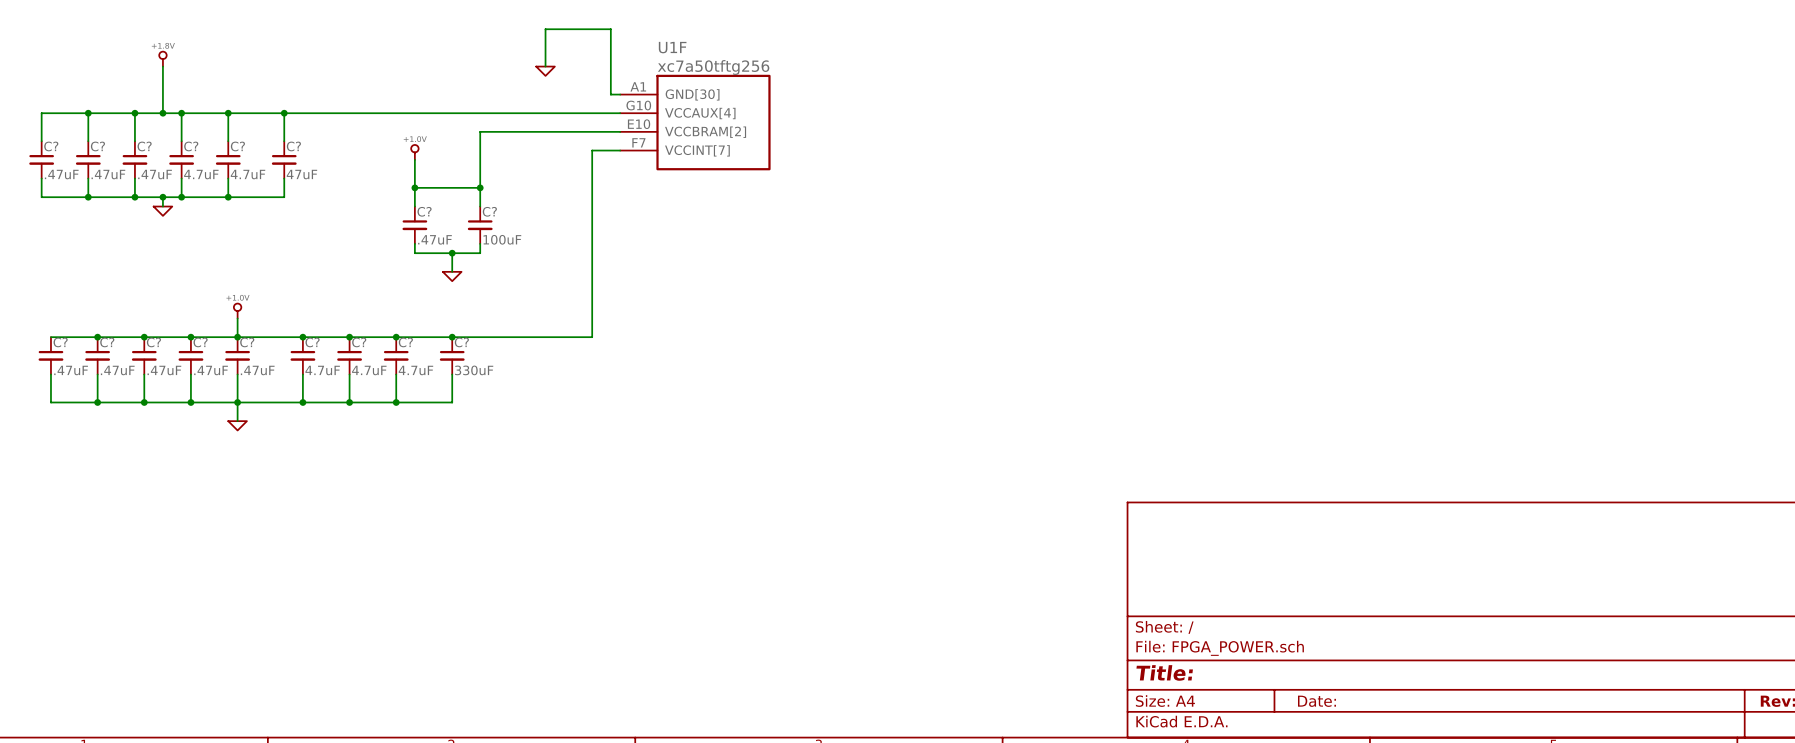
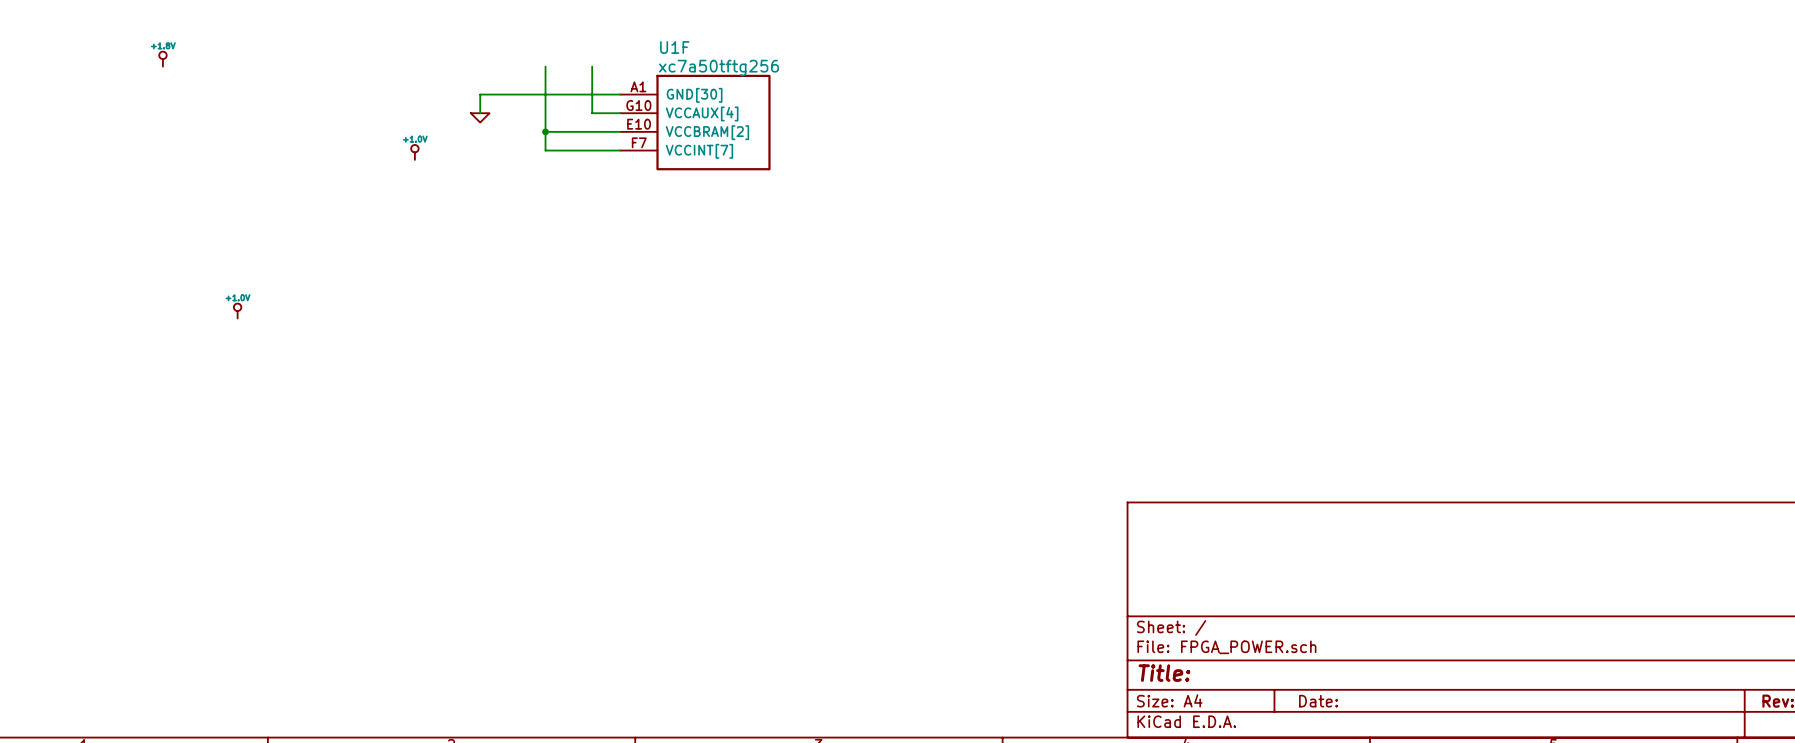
wire: (162, 66) (162, 113) -> none
wire: (545, 66) (545, 29) (610, 29) (610, 94) -> (545, 66) (545, 150) (592, 150)
power symbol position: (545, 71) -> (480, 117)
wire: none -> (610, 94) (480, 94) (480, 113)
wire: (88, 113) (88, 141) -> none
junction: (88, 113) -> none
wire: (134, 113) (134, 141) -> none
junction: (134, 113) -> none
junction: (162, 113) -> none
wire: (181, 113) (181, 141) -> none
junction: (181, 113) -> none
wire: (228, 113) (228, 141) -> none
junction: (228, 113) -> none
wire: (284, 113) (284, 141) -> none
junction: (284, 113) -> none
wire: (592, 113) (41, 113) (41, 141) -> (592, 113) (592, 66)
wire: (545, 131) (480, 131) (480, 206) -> none
junction: none -> (545, 131)
wire: (592, 150) (592, 337) (50, 337) -> none
C?: .47uF (41, 159) -> none
C?: .47uF (88, 159) -> none
C?: .47uF (134, 159) -> none
C?: 4.7uF (181, 159) -> none
C?: 4.7uF (228, 159) -> none
C?: 47uF (284, 159) -> none
wire: (414, 159) (414, 206) -> none
wire: (41, 178) (41, 197) (284, 197) (284, 178) -> none
wire: (88, 178) (88, 197) -> none
wire: (134, 178) (134, 197) -> none
wire: (181, 178) (181, 197) -> none
wire: (228, 178) (228, 197) -> none
wire: (414, 187) (480, 187) -> none
junction: (414, 187) -> none
junction: (480, 187) -> none
junction: (88, 197) -> none
junction: (134, 197) -> none
wire: (162, 197) (162, 206) -> none
junction: (162, 197) -> none
junction: (181, 197) -> none
junction: (228, 197) -> none
power symbol: (162, 211) -> none
C?: .47uF (414, 225) -> none
C?: 100uF (480, 225) -> none
wire: (414, 243) (414, 253) (480, 253) (480, 243) -> none
wire: (452, 253) (452, 271) -> none
junction: (452, 253) -> none
power symbol: (452, 276) -> none
wire: (237, 318) (237, 337) -> none
junction: (97, 337) -> none
junction: (144, 337) -> none
junction: (190, 337) -> none
junction: (237, 337) -> none
junction: (302, 337) -> none
junction: (349, 337) -> none
junction: (396, 337) -> none
junction: (452, 337) -> none
C?: .47uF (50, 355) -> none
C?: .47uF (97, 355) -> none
C?: .47uF (144, 355) -> none
C?: .47uF (190, 355) -> none
C?: .47uF (237, 355) -> none
C?: 4.7uF (302, 355) -> none
C?: 4.7uF (349, 355) -> none
C?: 4.7uF (396, 355) -> none
C?: 330uF (452, 355) -> none
wire: (50, 374) (50, 402) (452, 402) (452, 374) -> none
wire: (97, 374) (97, 402) -> none
wire: (144, 374) (144, 402) -> none
wire: (190, 374) (190, 402) -> none
wire: (237, 374) (237, 421) -> none
wire: (302, 374) (302, 402) -> none
wire: (349, 374) (349, 402) -> none
wire: (396, 374) (396, 402) -> none
junction: (97, 402) -> none
junction: (144, 402) -> none
junction: (190, 402) -> none
junction: (237, 402) -> none
junction: (302, 402) -> none
junction: (349, 402) -> none
junction: (396, 402) -> none
power symbol: (237, 425) -> none

